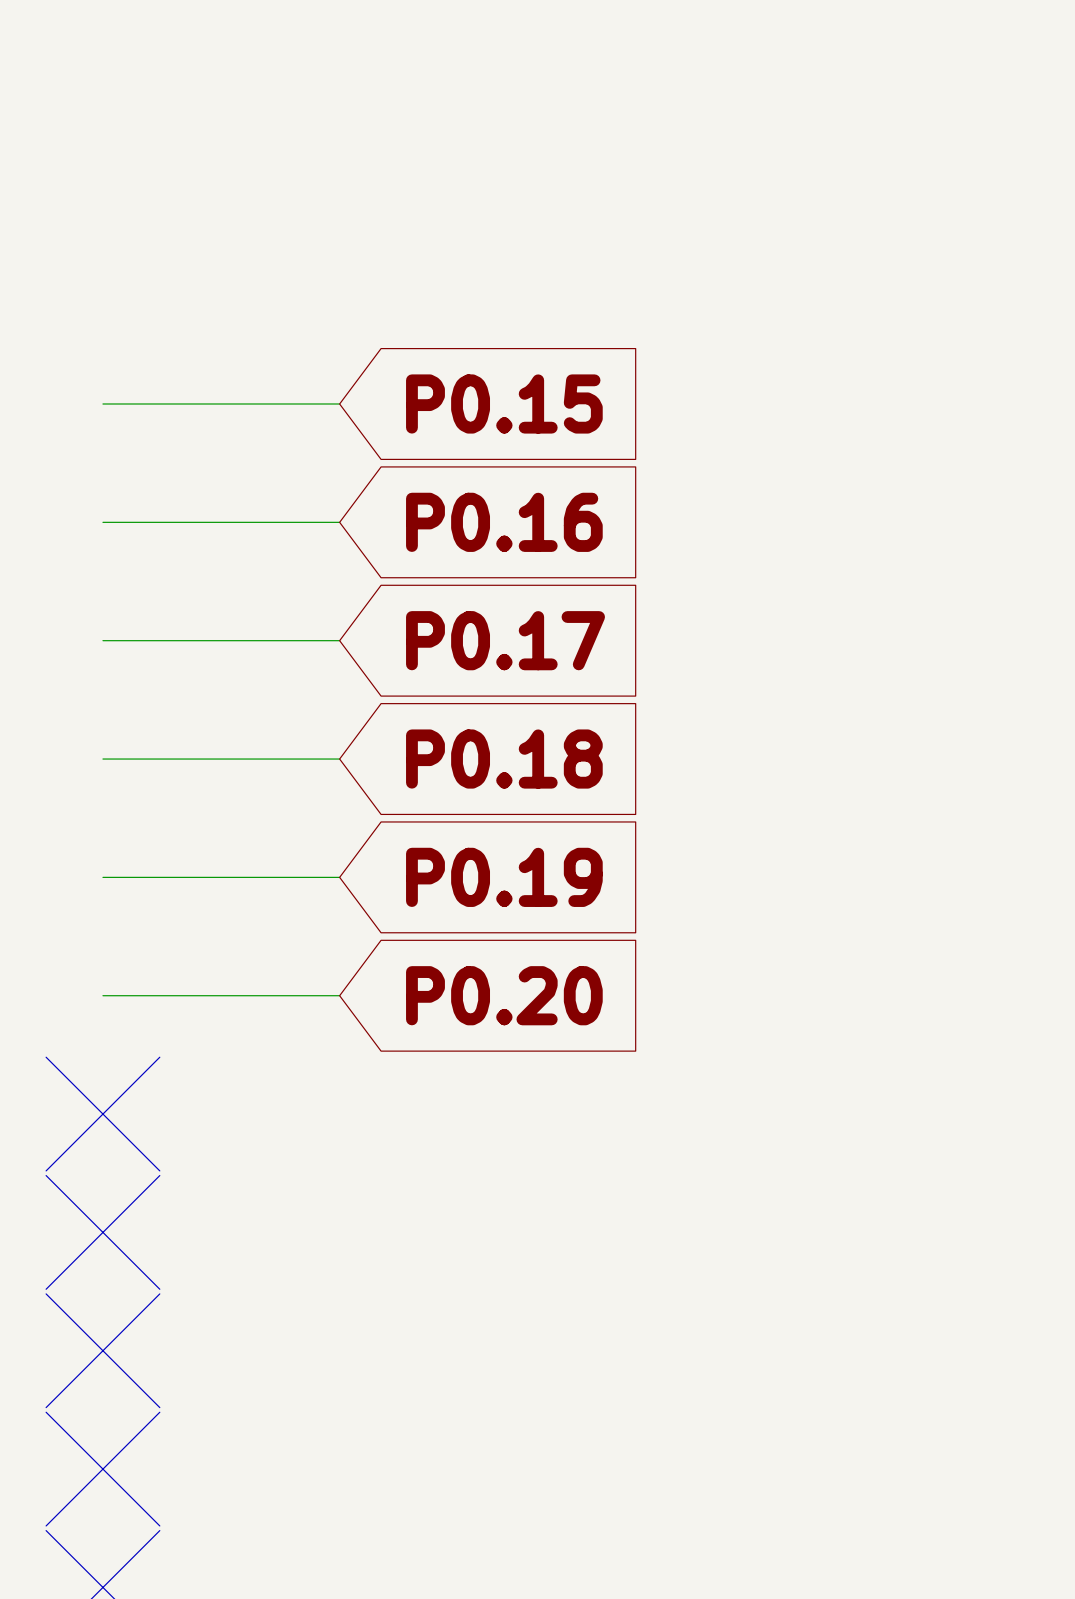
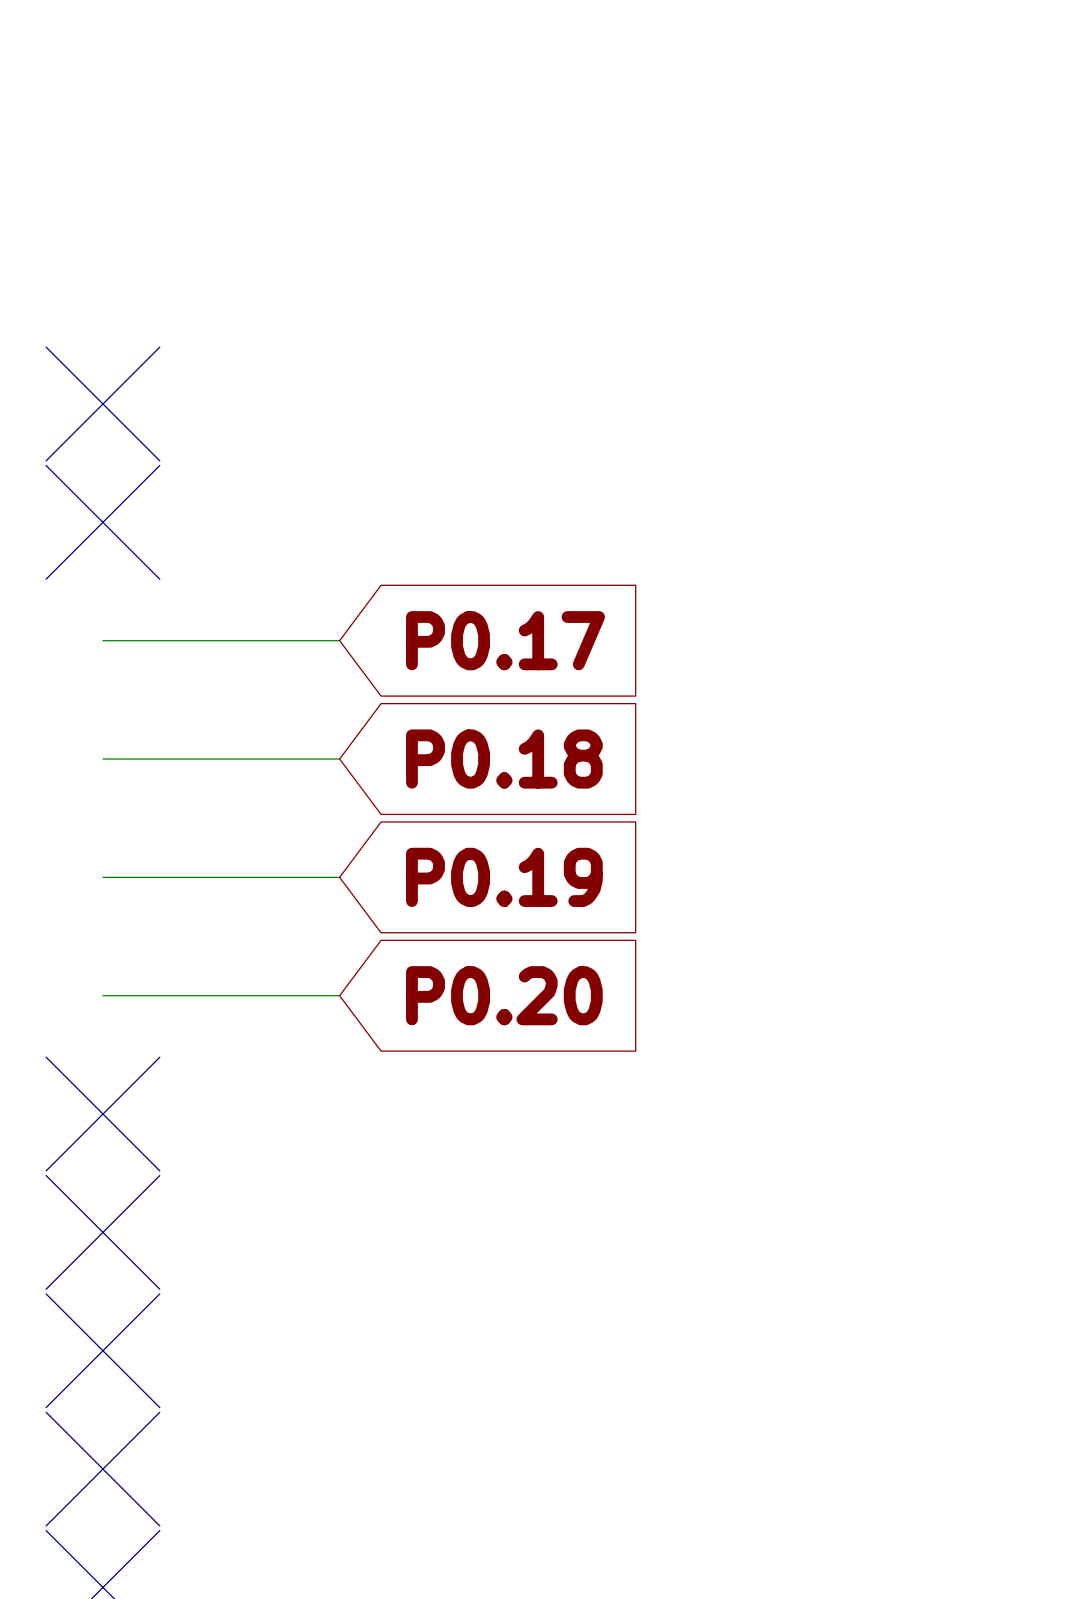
wire: (102, 403) (339, 403) -> none
no-connect mark: none -> (102, 403)
global label: P0.15 (504, 403) -> none
wire: (102, 522) (339, 522) -> none
no-connect mark: none -> (102, 522)
global label: P0.16 (504, 522) -> none

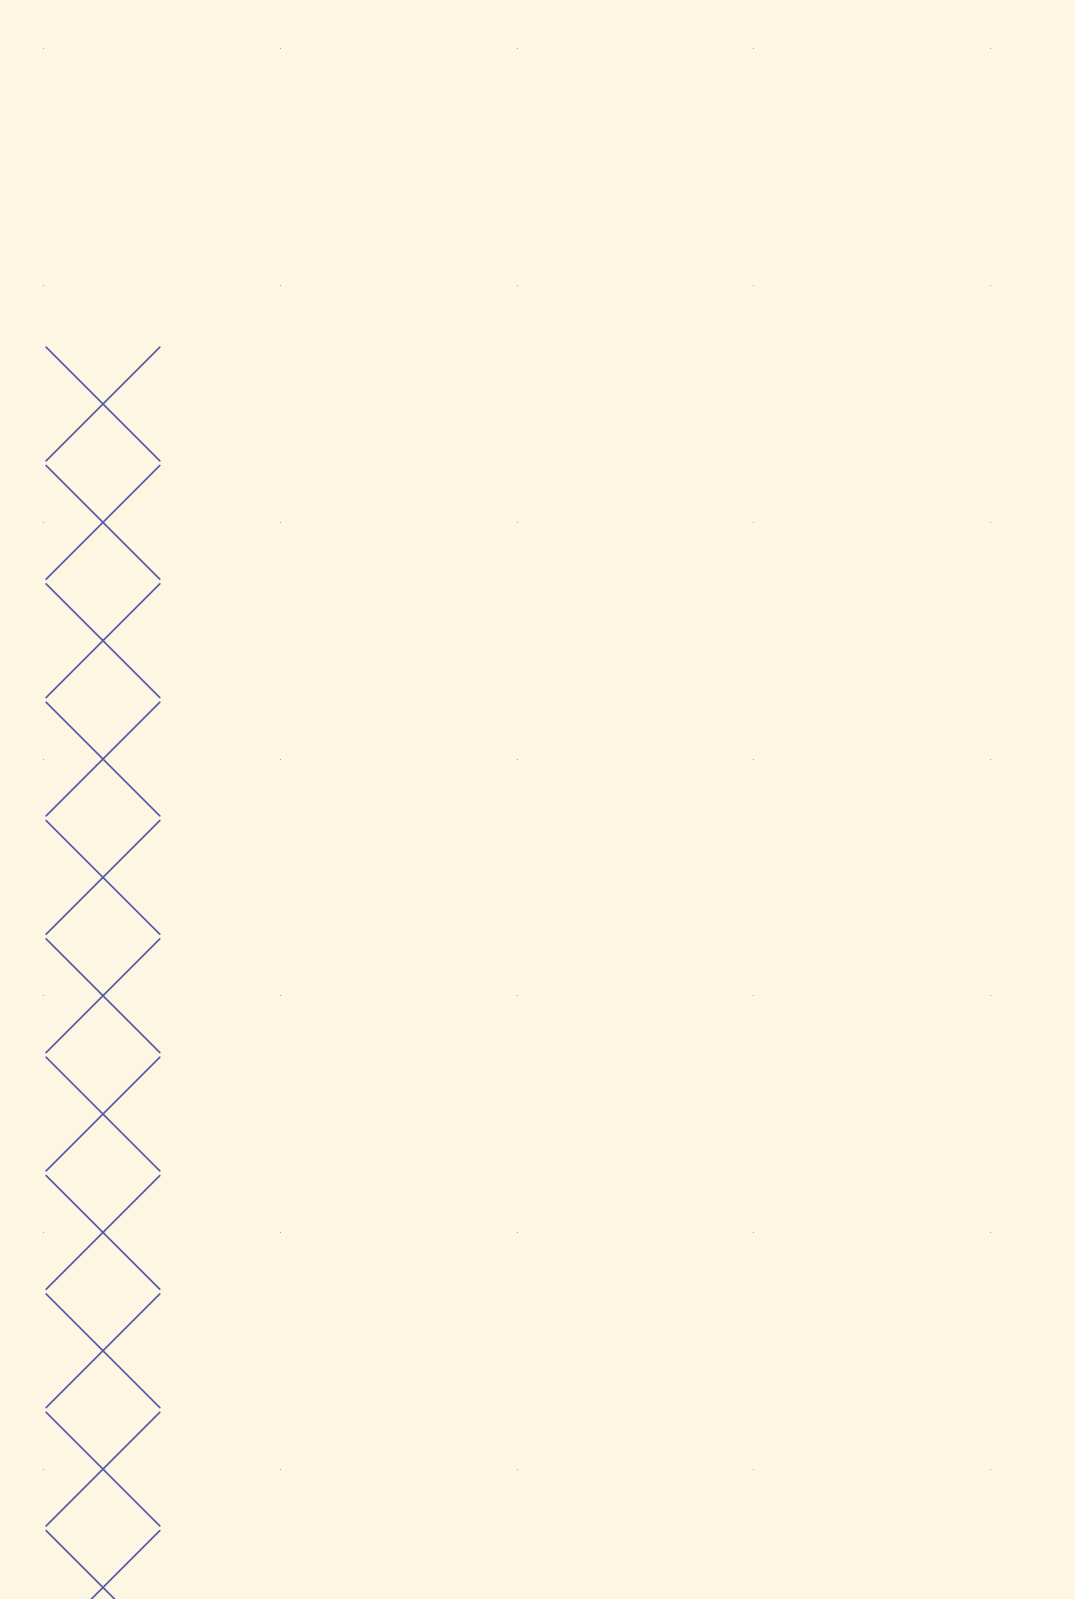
wire: (102, 640) (339, 640) -> none
no-connect mark: none -> (102, 640)
global label: P0.17 (505, 640) -> none
wire: (102, 759) (339, 759) -> none
no-connect mark: none -> (102, 759)
global label: P0.18 (504, 759) -> none
wire: (102, 877) (339, 877) -> none
no-connect mark: none -> (102, 877)
global label: P0.19 (504, 877) -> none
wire: (102, 995) (339, 995) -> none
no-connect mark: none -> (102, 995)
global label: P0.20 (504, 995) -> none

